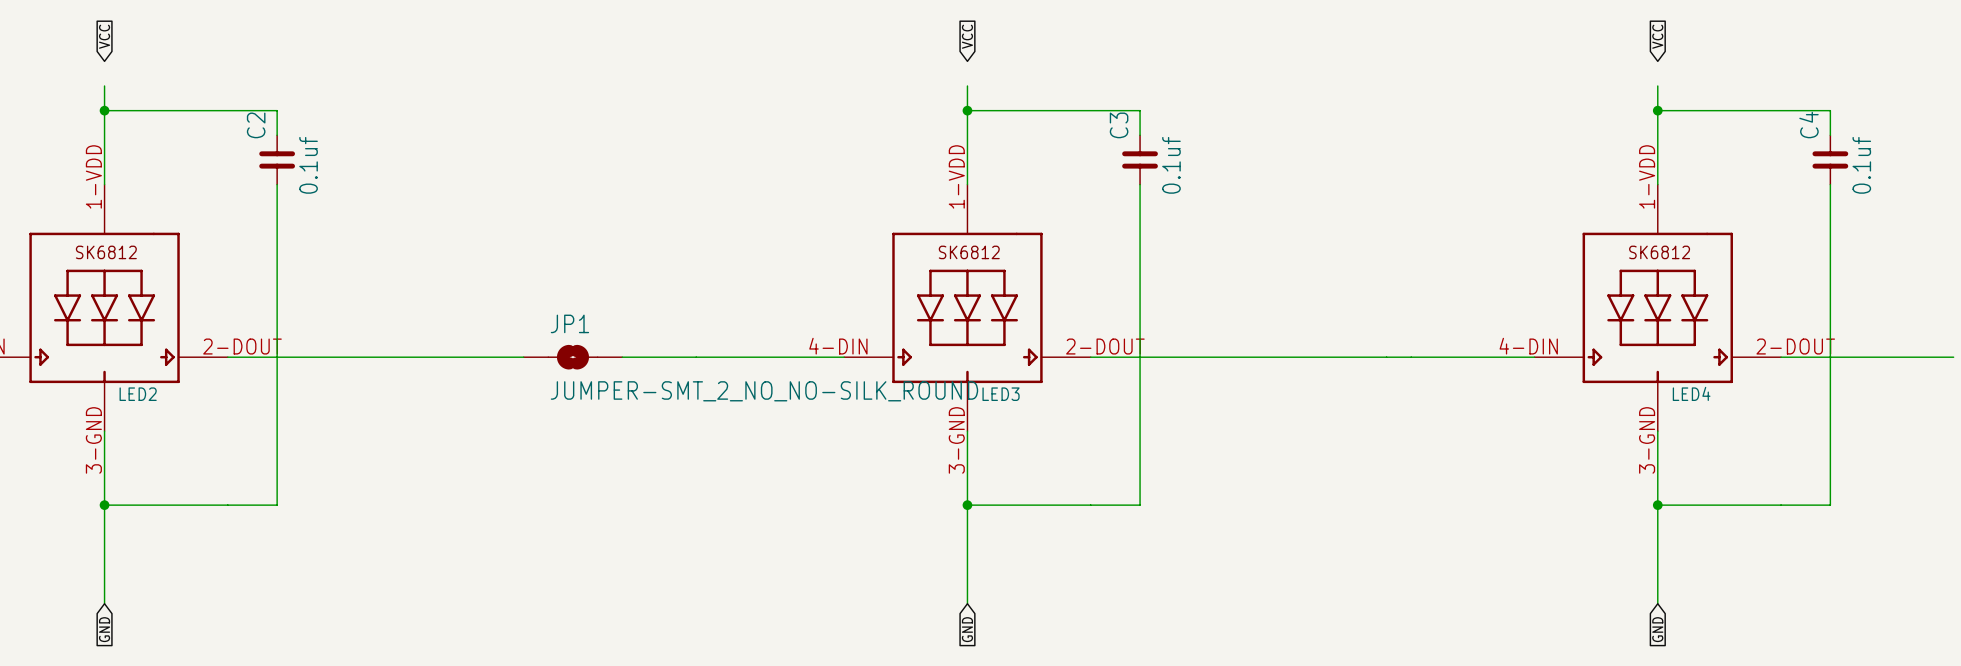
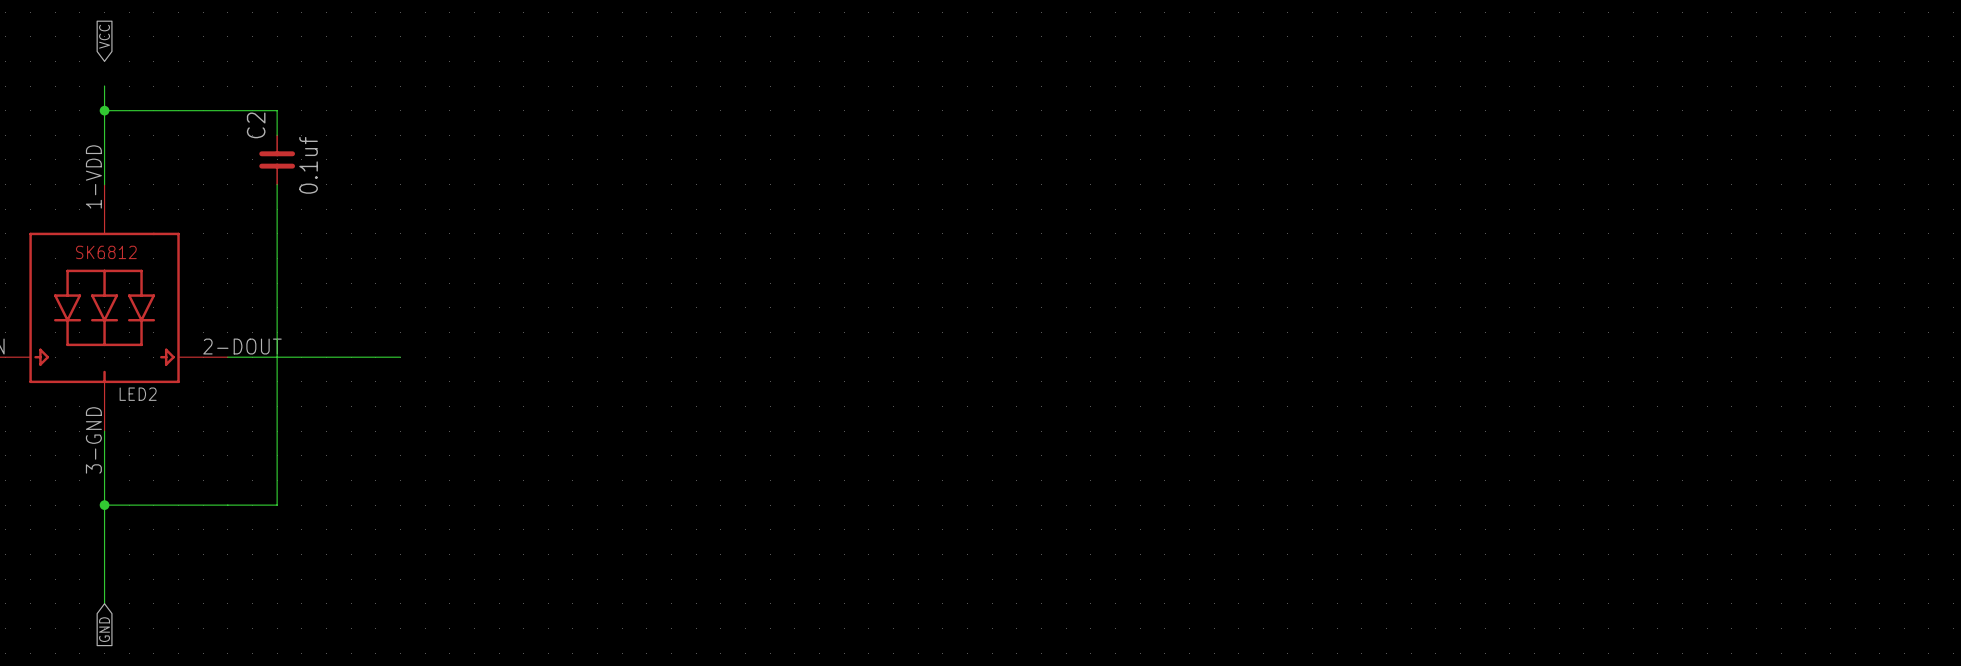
global label: VCC (967, 36) -> none
global label: VCC (1657, 36) -> none
wire: (967, 86) (967, 184) -> none
wire: (1657, 86) (1657, 184) -> none
wire: (967, 110) (1140, 110) (1140, 135) -> none
junction: (967, 110) -> none
wire: (1657, 110) (1830, 110) (1830, 135) -> none
junction: (1657, 110) -> none
C3: 0.1uf (1140, 159) -> none
C4: 0.1uf (1830, 159) -> none
wire: (1140, 184) (1140, 505) (967, 505) -> none
wire: (1830, 184) (1830, 505) (1657, 505) -> none
LED3: (967, 307) -> none
LED4: (1657, 307) -> none
wire: (400, 357) (523, 357) -> none
JP1: JUMPER-SMT_2_NO_NO-SILK_ROUND (572, 357) -> none
wire: (622, 357) (844, 357) -> none
wire: (1090, 357) (1534, 357) -> none
wire: (1781, 357) (1953, 357) -> none
wire: (967, 431) (967, 603) -> none
wire: (1657, 431) (1657, 603) -> none
junction: (967, 505) -> none
junction: (1657, 505) -> none
global label: GND (967, 629) -> none
global label: GND (1657, 629) -> none

